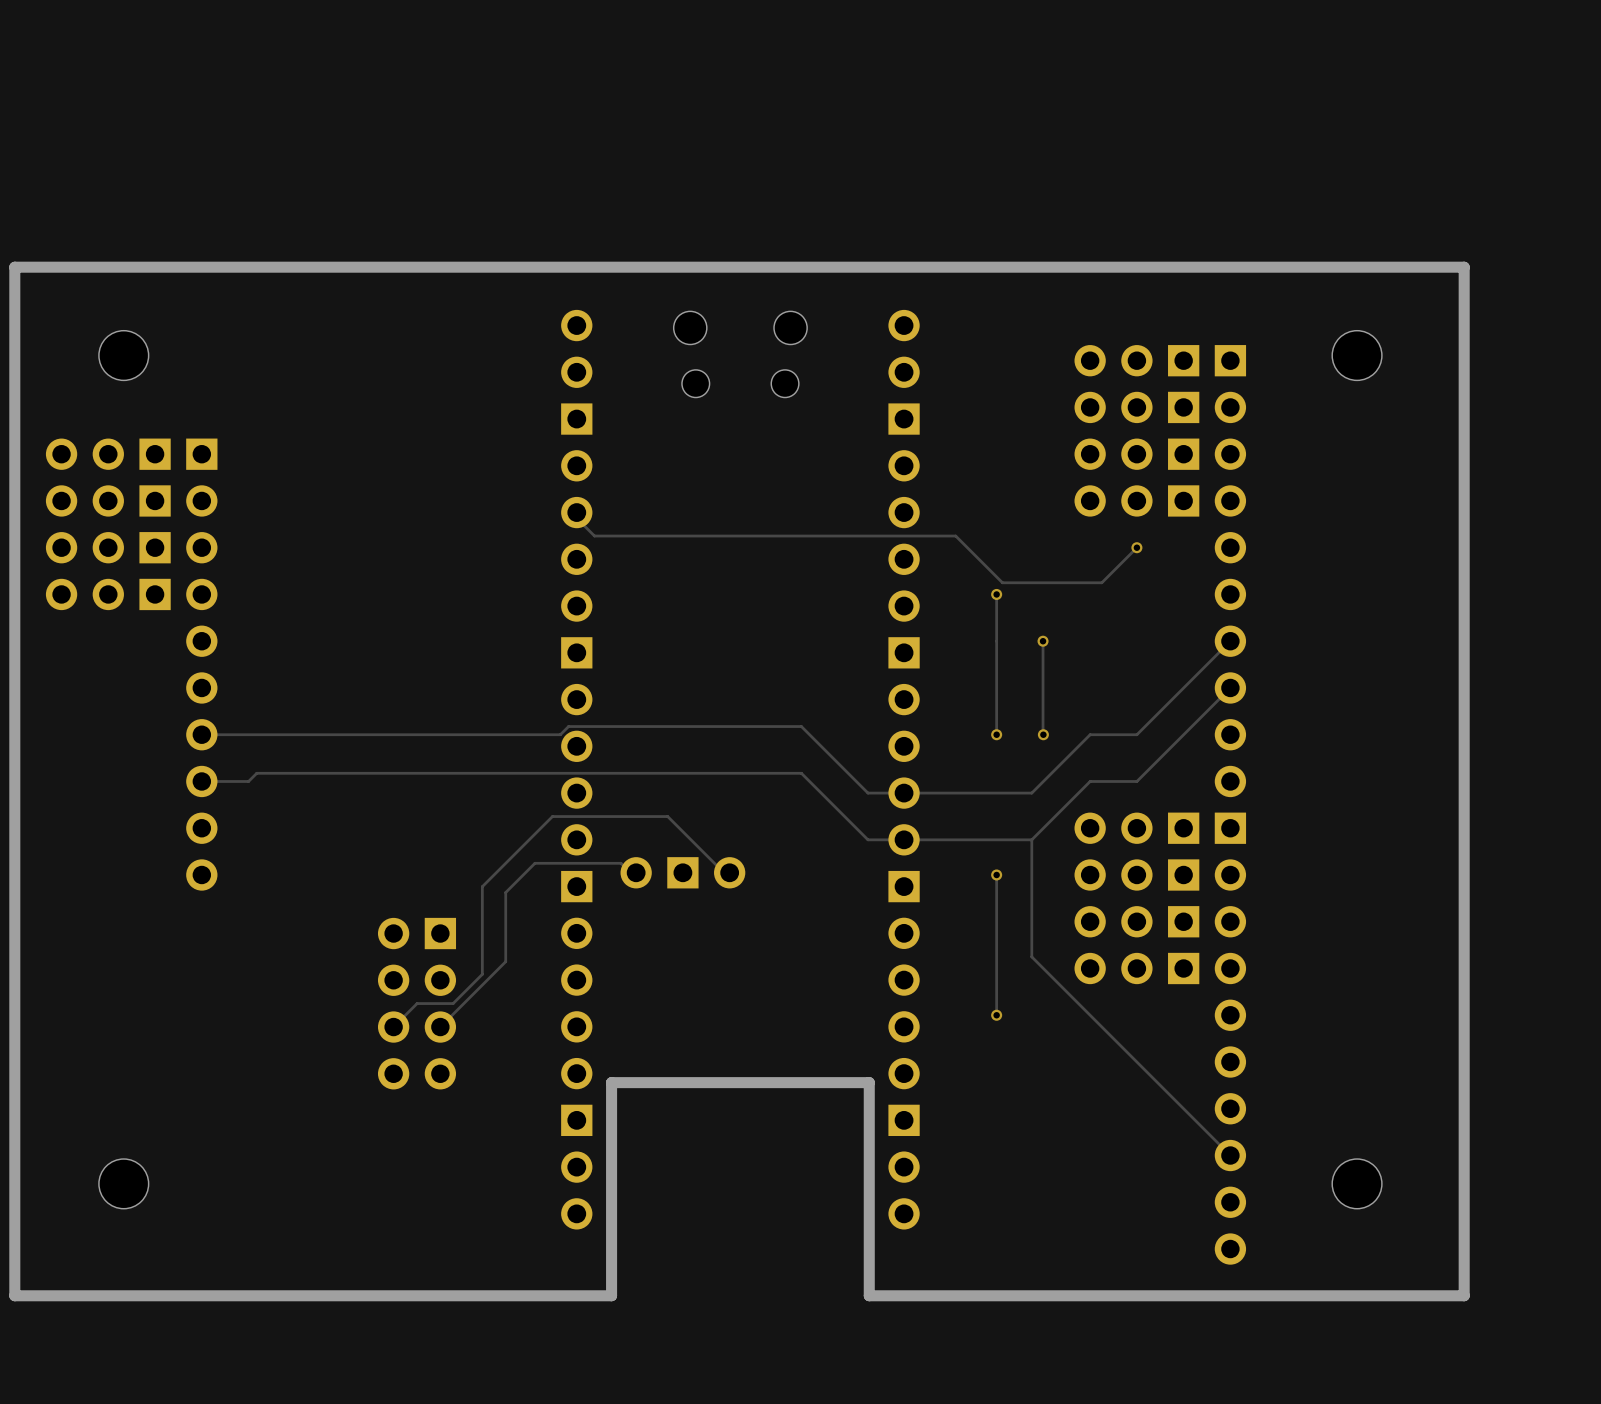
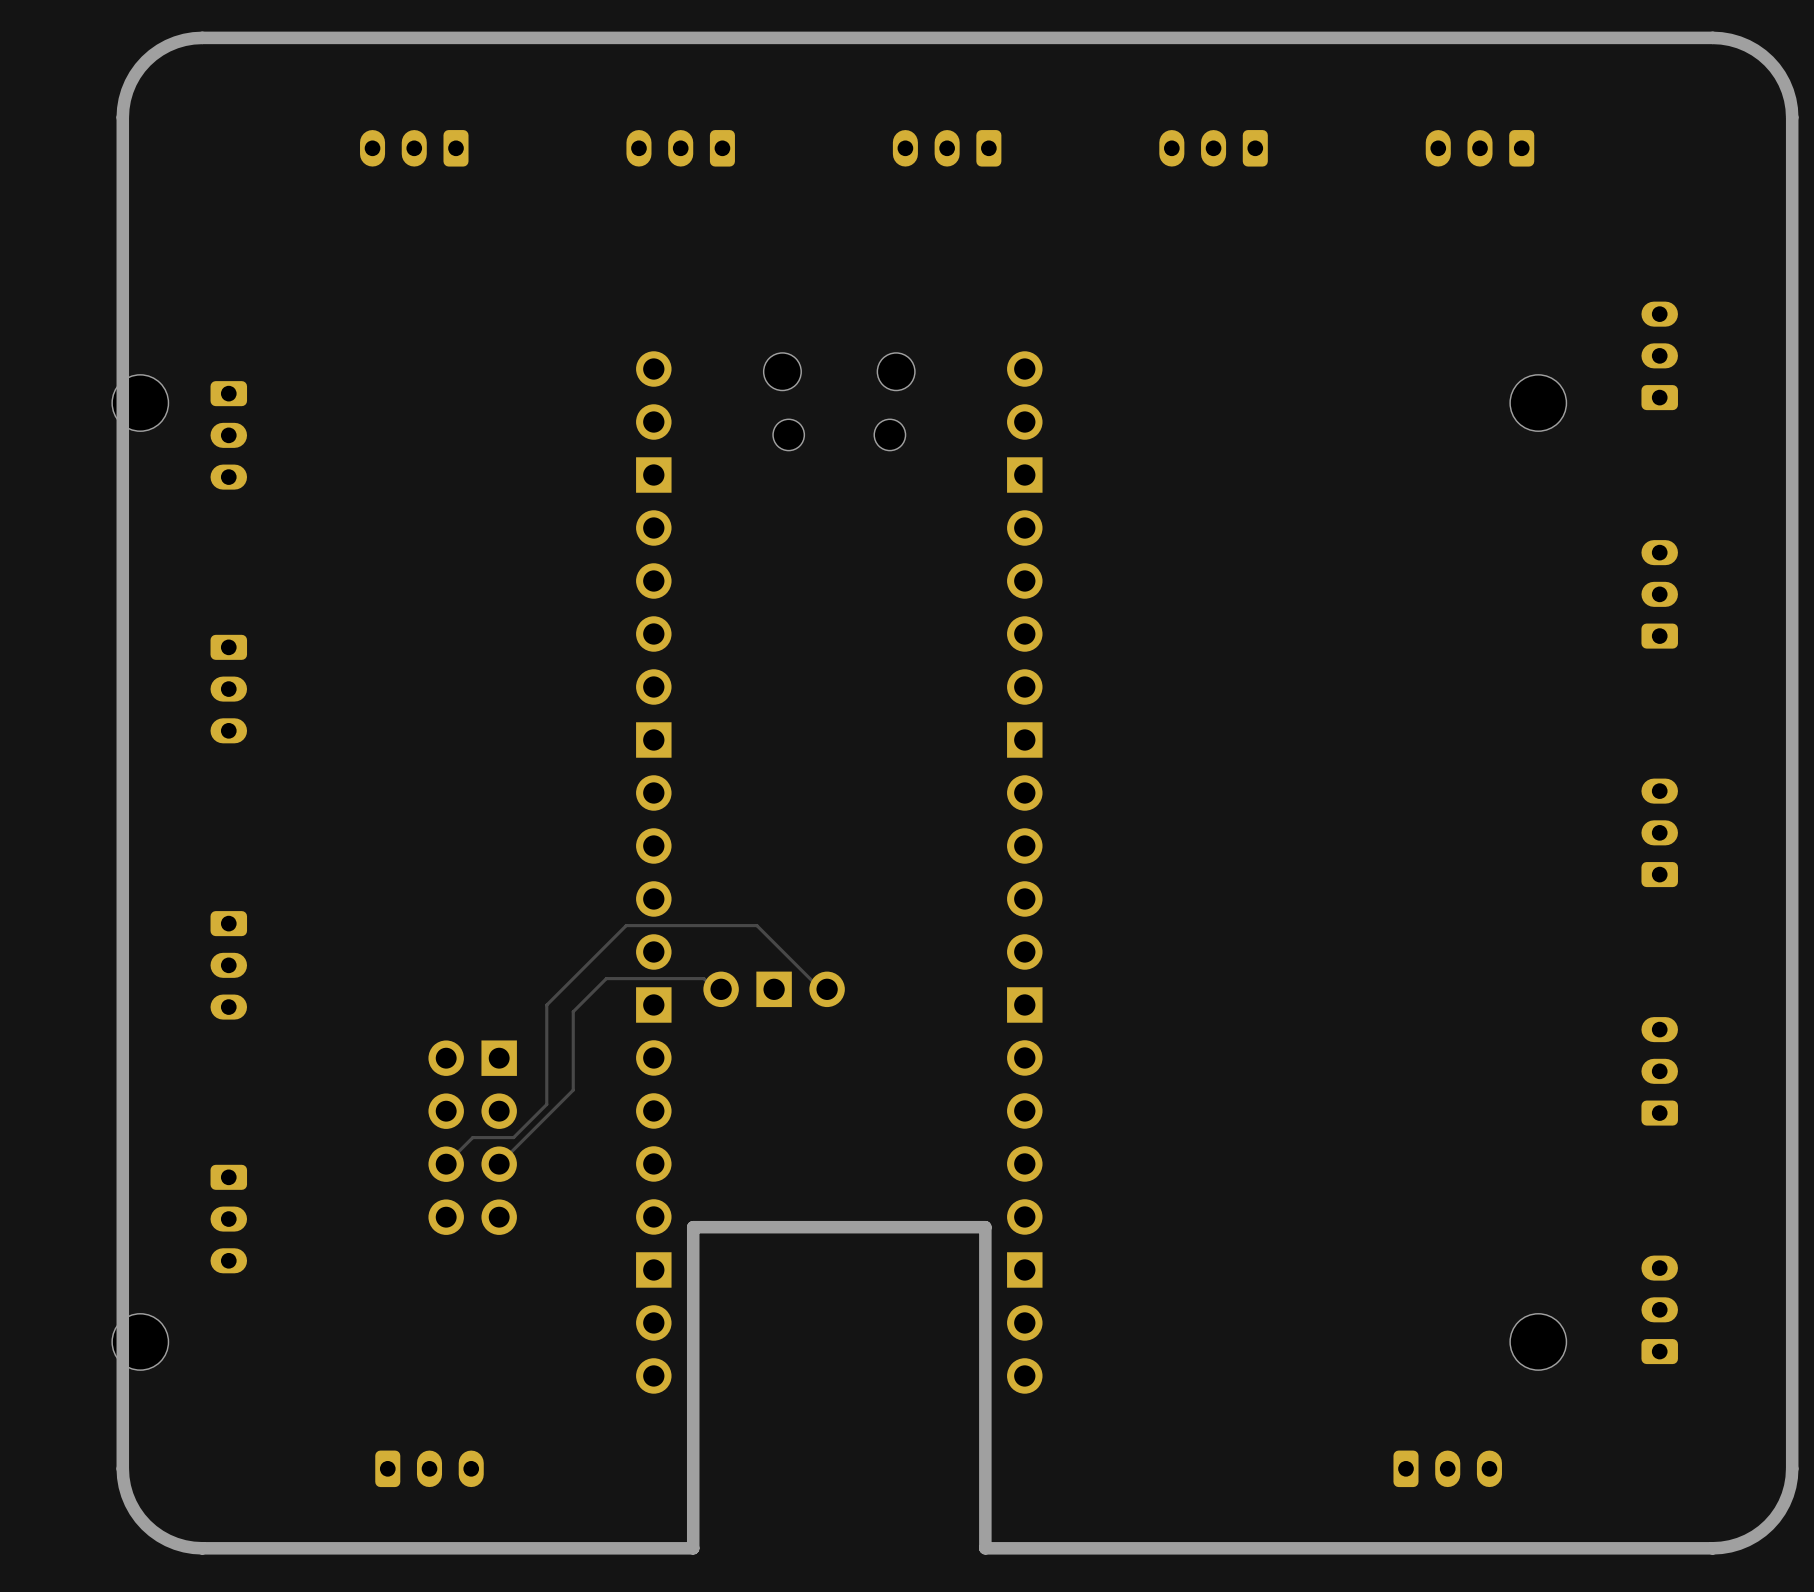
part: none -> (414, 148)
part: none -> (680, 148)
part: none -> (947, 148)
part: none -> (1213, 148)
part: none -> (1480, 148)
part: none -> (1659, 355)
part: (1136, 360) -> none
part: none -> (228, 435)
part: (1136, 407) -> none
part: (108, 454) -> none
part: (1136, 454) -> none
part: (108, 500) -> none
part: (1136, 500) -> none
track: (571, 512) (594, 536) (955, 536) (1002, 582) (1101, 582) (1136, 547) -> none
part: none -> (1659, 594)
part: (108, 547) -> none
via: (1136, 547) -> none
part: (1230, 571) -> none
part: (108, 594) -> none
track: (996, 594) (996, 734) -> none
via: (996, 594) -> none
part: none -> (228, 689)
track: (1043, 641) (1043, 734) -> none
via: (1043, 641) -> none
track: (1230, 641) (1136, 734) (1090, 734) (1031, 793) (867, 793) (801, 726) (568, 726) (560, 734) (201, 734) -> none
part: (201, 664) -> none
track: (1230, 687) (1136, 781) (1090, 781) (1031, 839) -> none
via: (996, 734) -> none
via: (1043, 734) -> none
part: none -> (1659, 832)
track: (201, 781) (248, 781) (256, 773) (801, 773) (867, 839) (1031, 839) -> none
part: (1136, 828) -> none
track: (1031, 839) (1031, 956) (1230, 1155) -> none
part: none -> (228, 965)
track: (996, 874) (996, 1015) -> none
via: (996, 874) -> none
part: (1136, 874) -> none
part: (1136, 921) -> none
part: none -> (1659, 1071)
part: (1136, 968) -> none
via: (996, 1015) -> none
part: (1230, 1038) -> none
part: none -> (228, 1219)
part: none -> (1659, 1309)
part: none -> (429, 1468)
board edge: (869, 1295) (1464, 1295) (1464, 267) (14, 267) (14, 1295) (611, 1295) -> (985, 1468) (985, 1548) (1721, 1547) (1738, 1543) (1755, 1536) (1774, 1518) (1784, 1503) (1790, 1486) (1792, 1468) (1792, 117) (1790, 99) (1780, 75) (1762, 55) (1747, 45) (1730, 39) (1712, 37) (202, 37) (184, 39) (167, 45) (152, 55) (140, 67) (127, 91) (122, 117) (122, 1468) (127, 1495) (134, 1511) (152, 1530) (176, 1543) (193, 1547) (693, 1548) (693, 1468)
part: none -> (1447, 1468)

